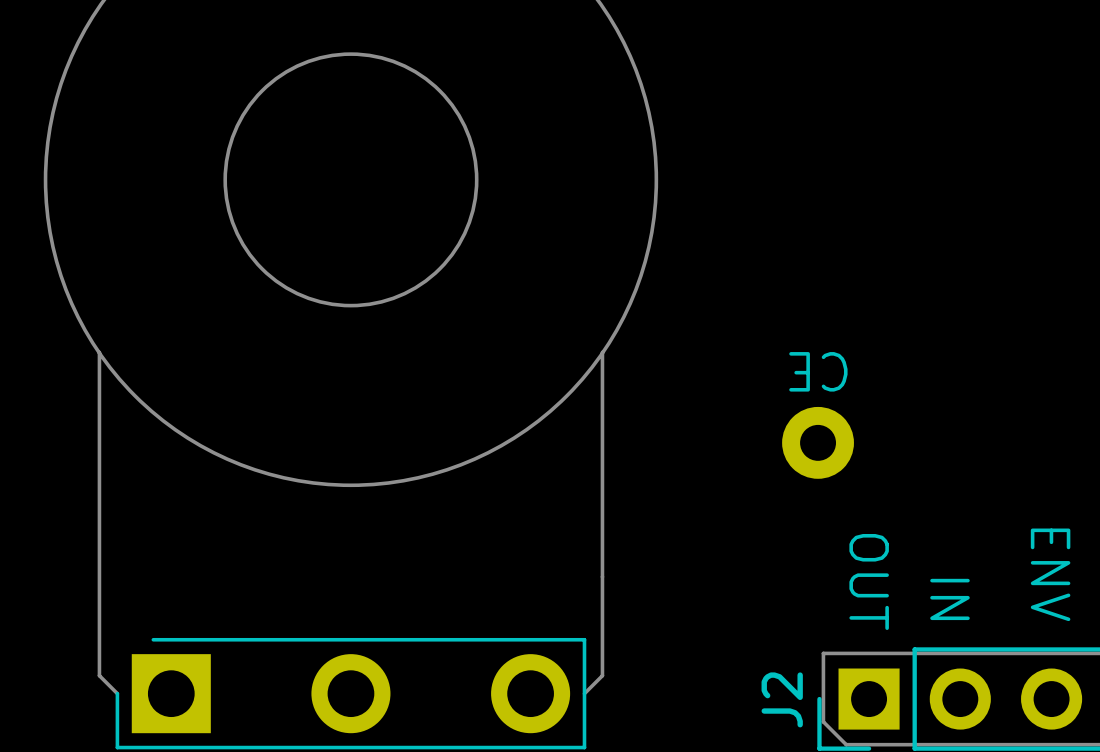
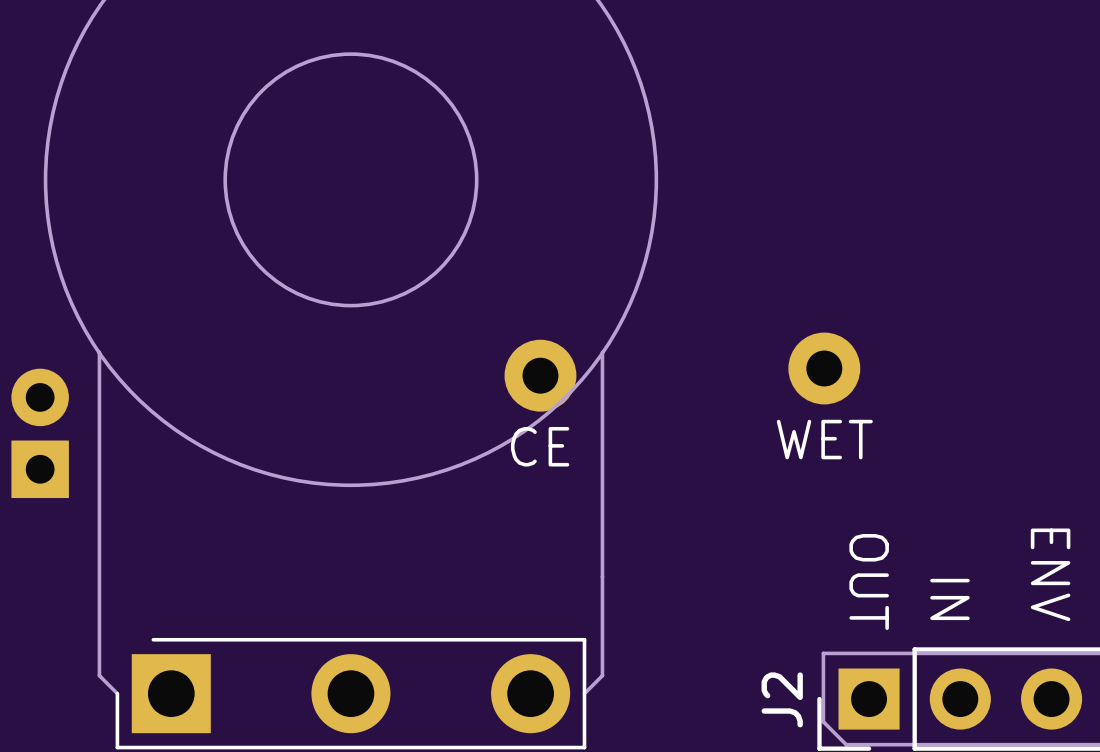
part: none -> WET (824, 368)
part value rotation: 0° (818, 371) -> 180° (540, 446)
part value position: CE (818, 371) -> CE (540, 446)
part: none -> (40, 433)
part position: (818, 442) -> (540, 375)

